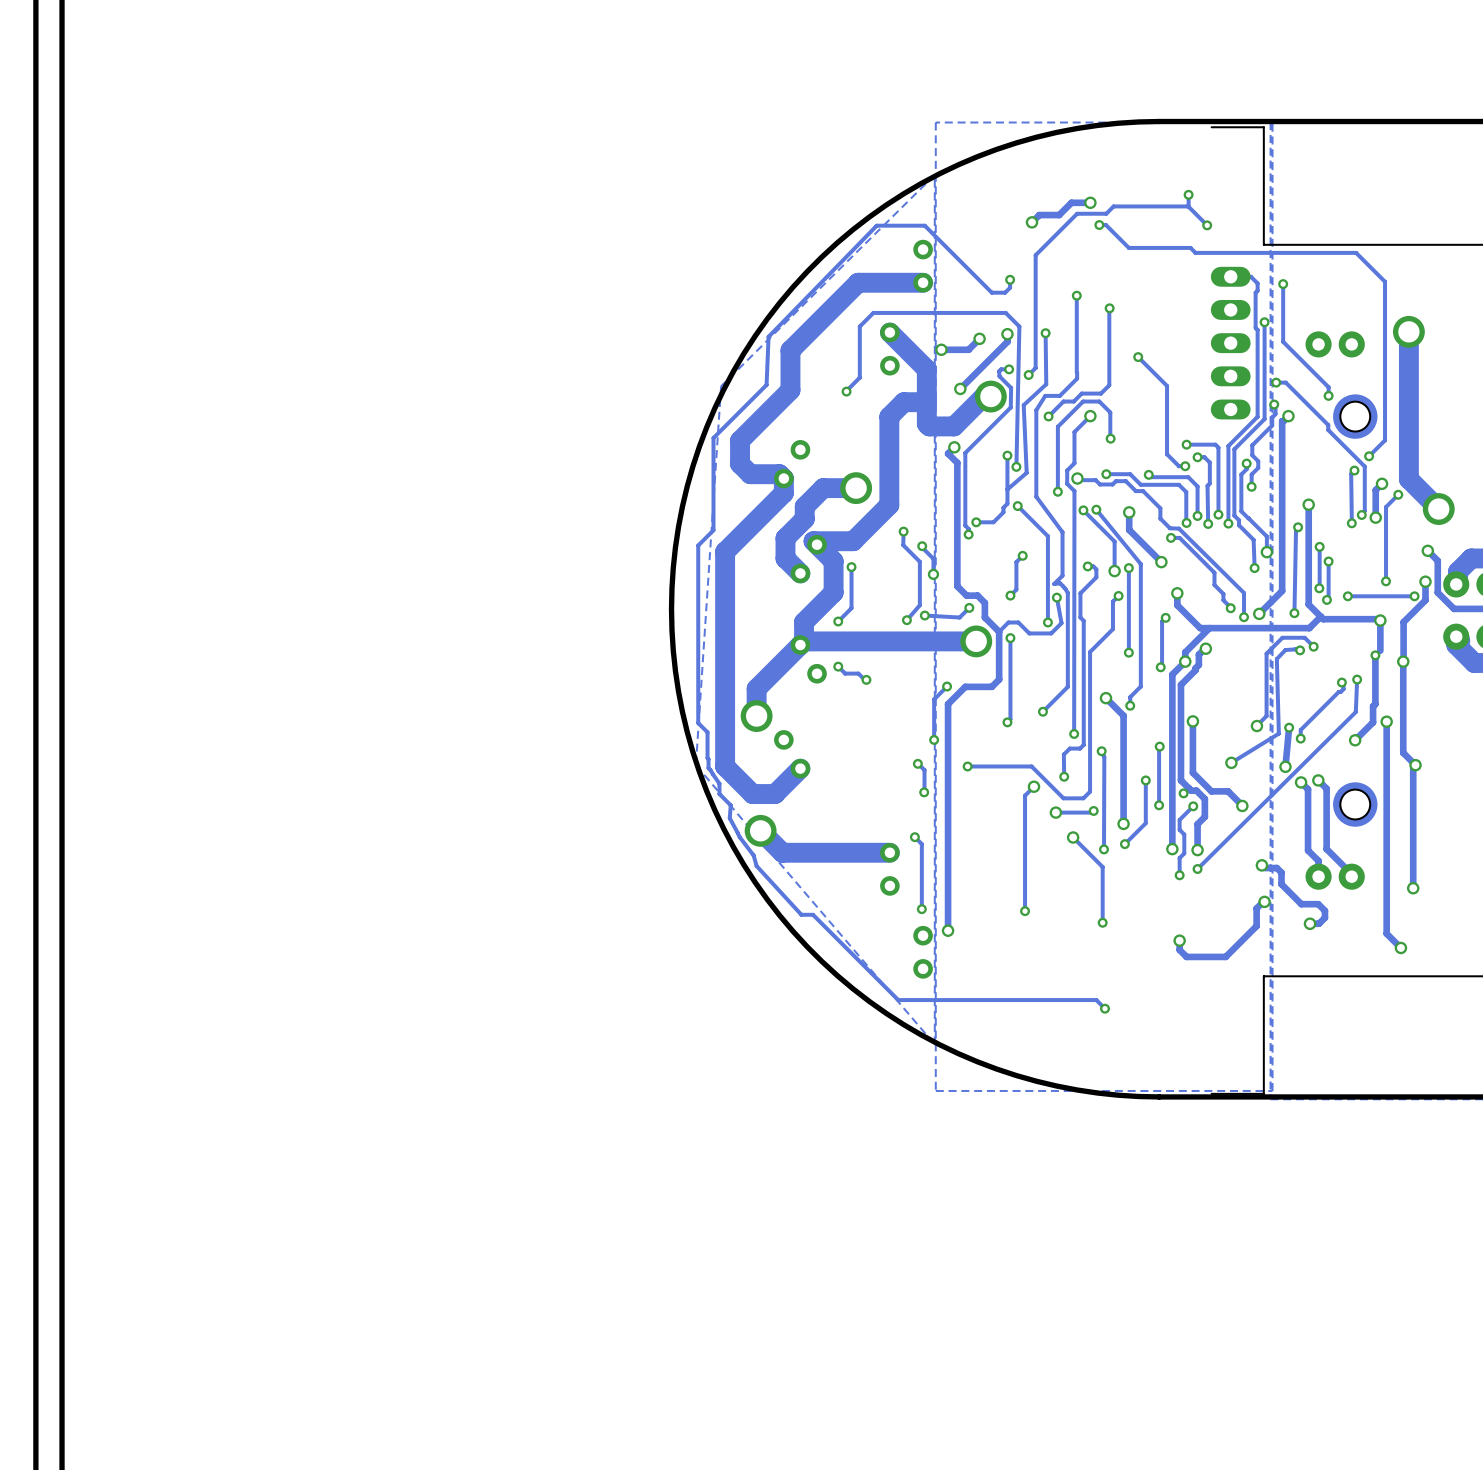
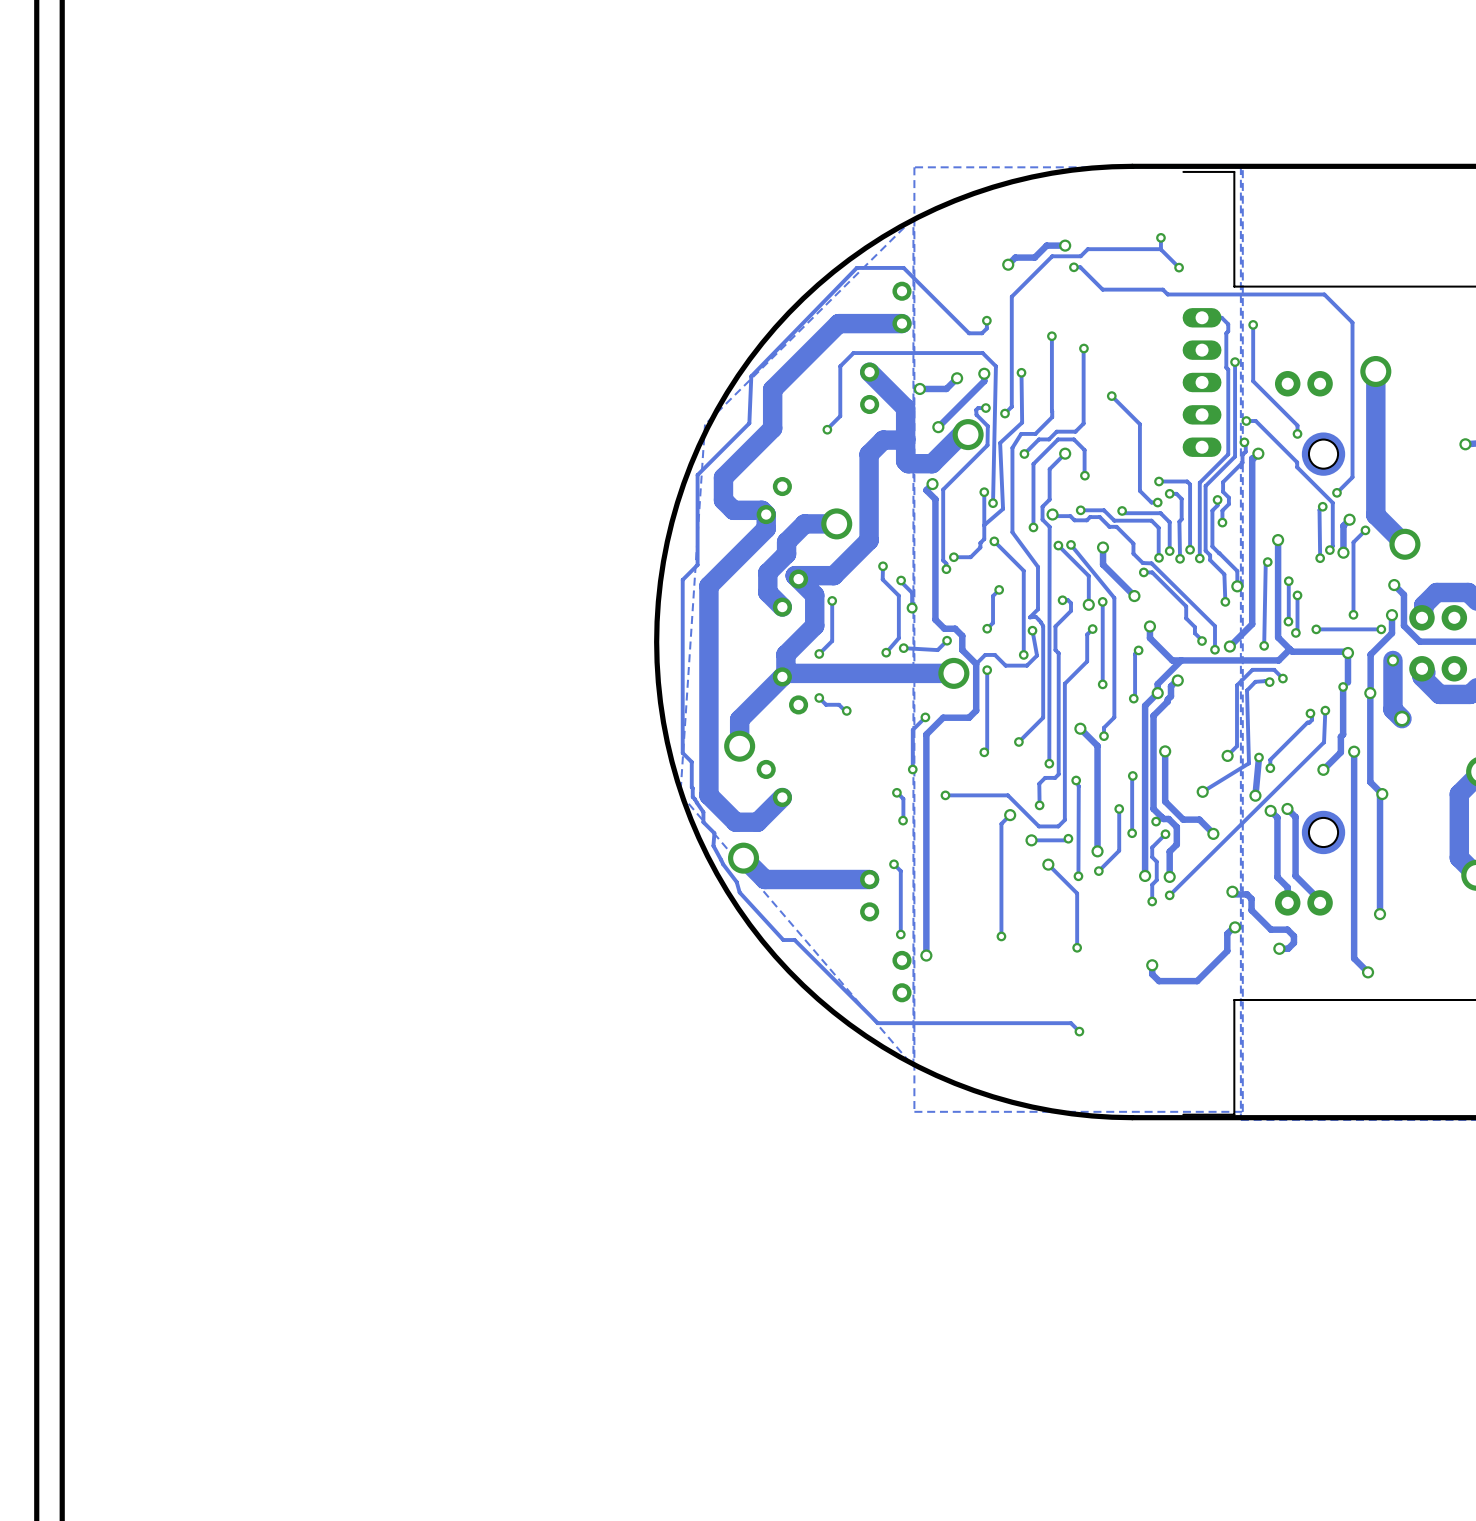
track: none -> (1392, 660) (1392, 709) (1402, 718)
via: none -> (1392, 660)
via: none -> (1402, 718)

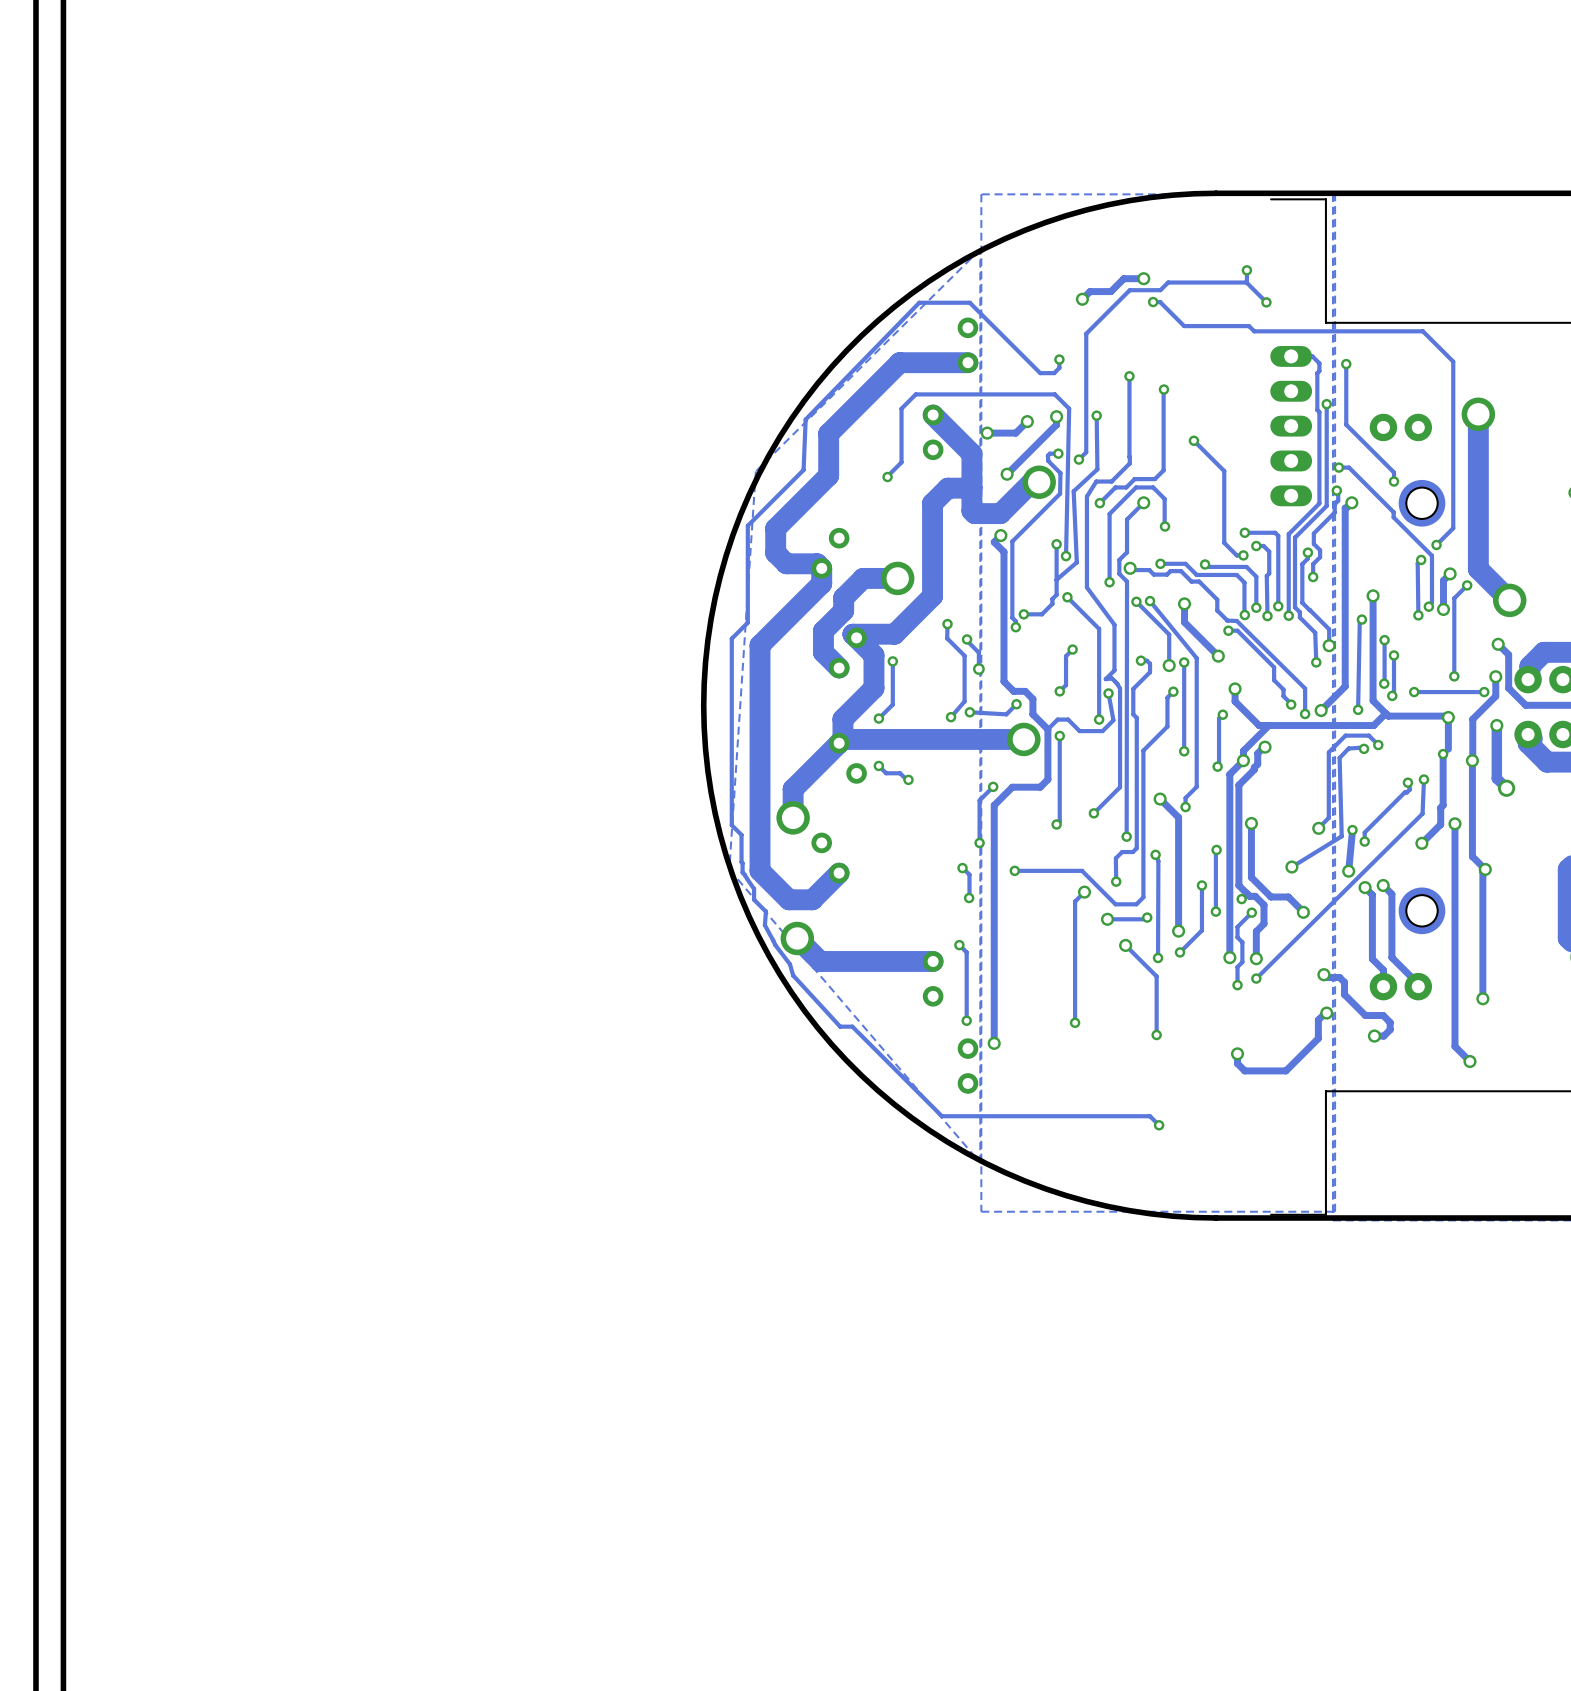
track width: thick (1392, 660) (1392, 709) (1402, 718) -> thin (1496, 725) (1496, 778) (1506, 788)

